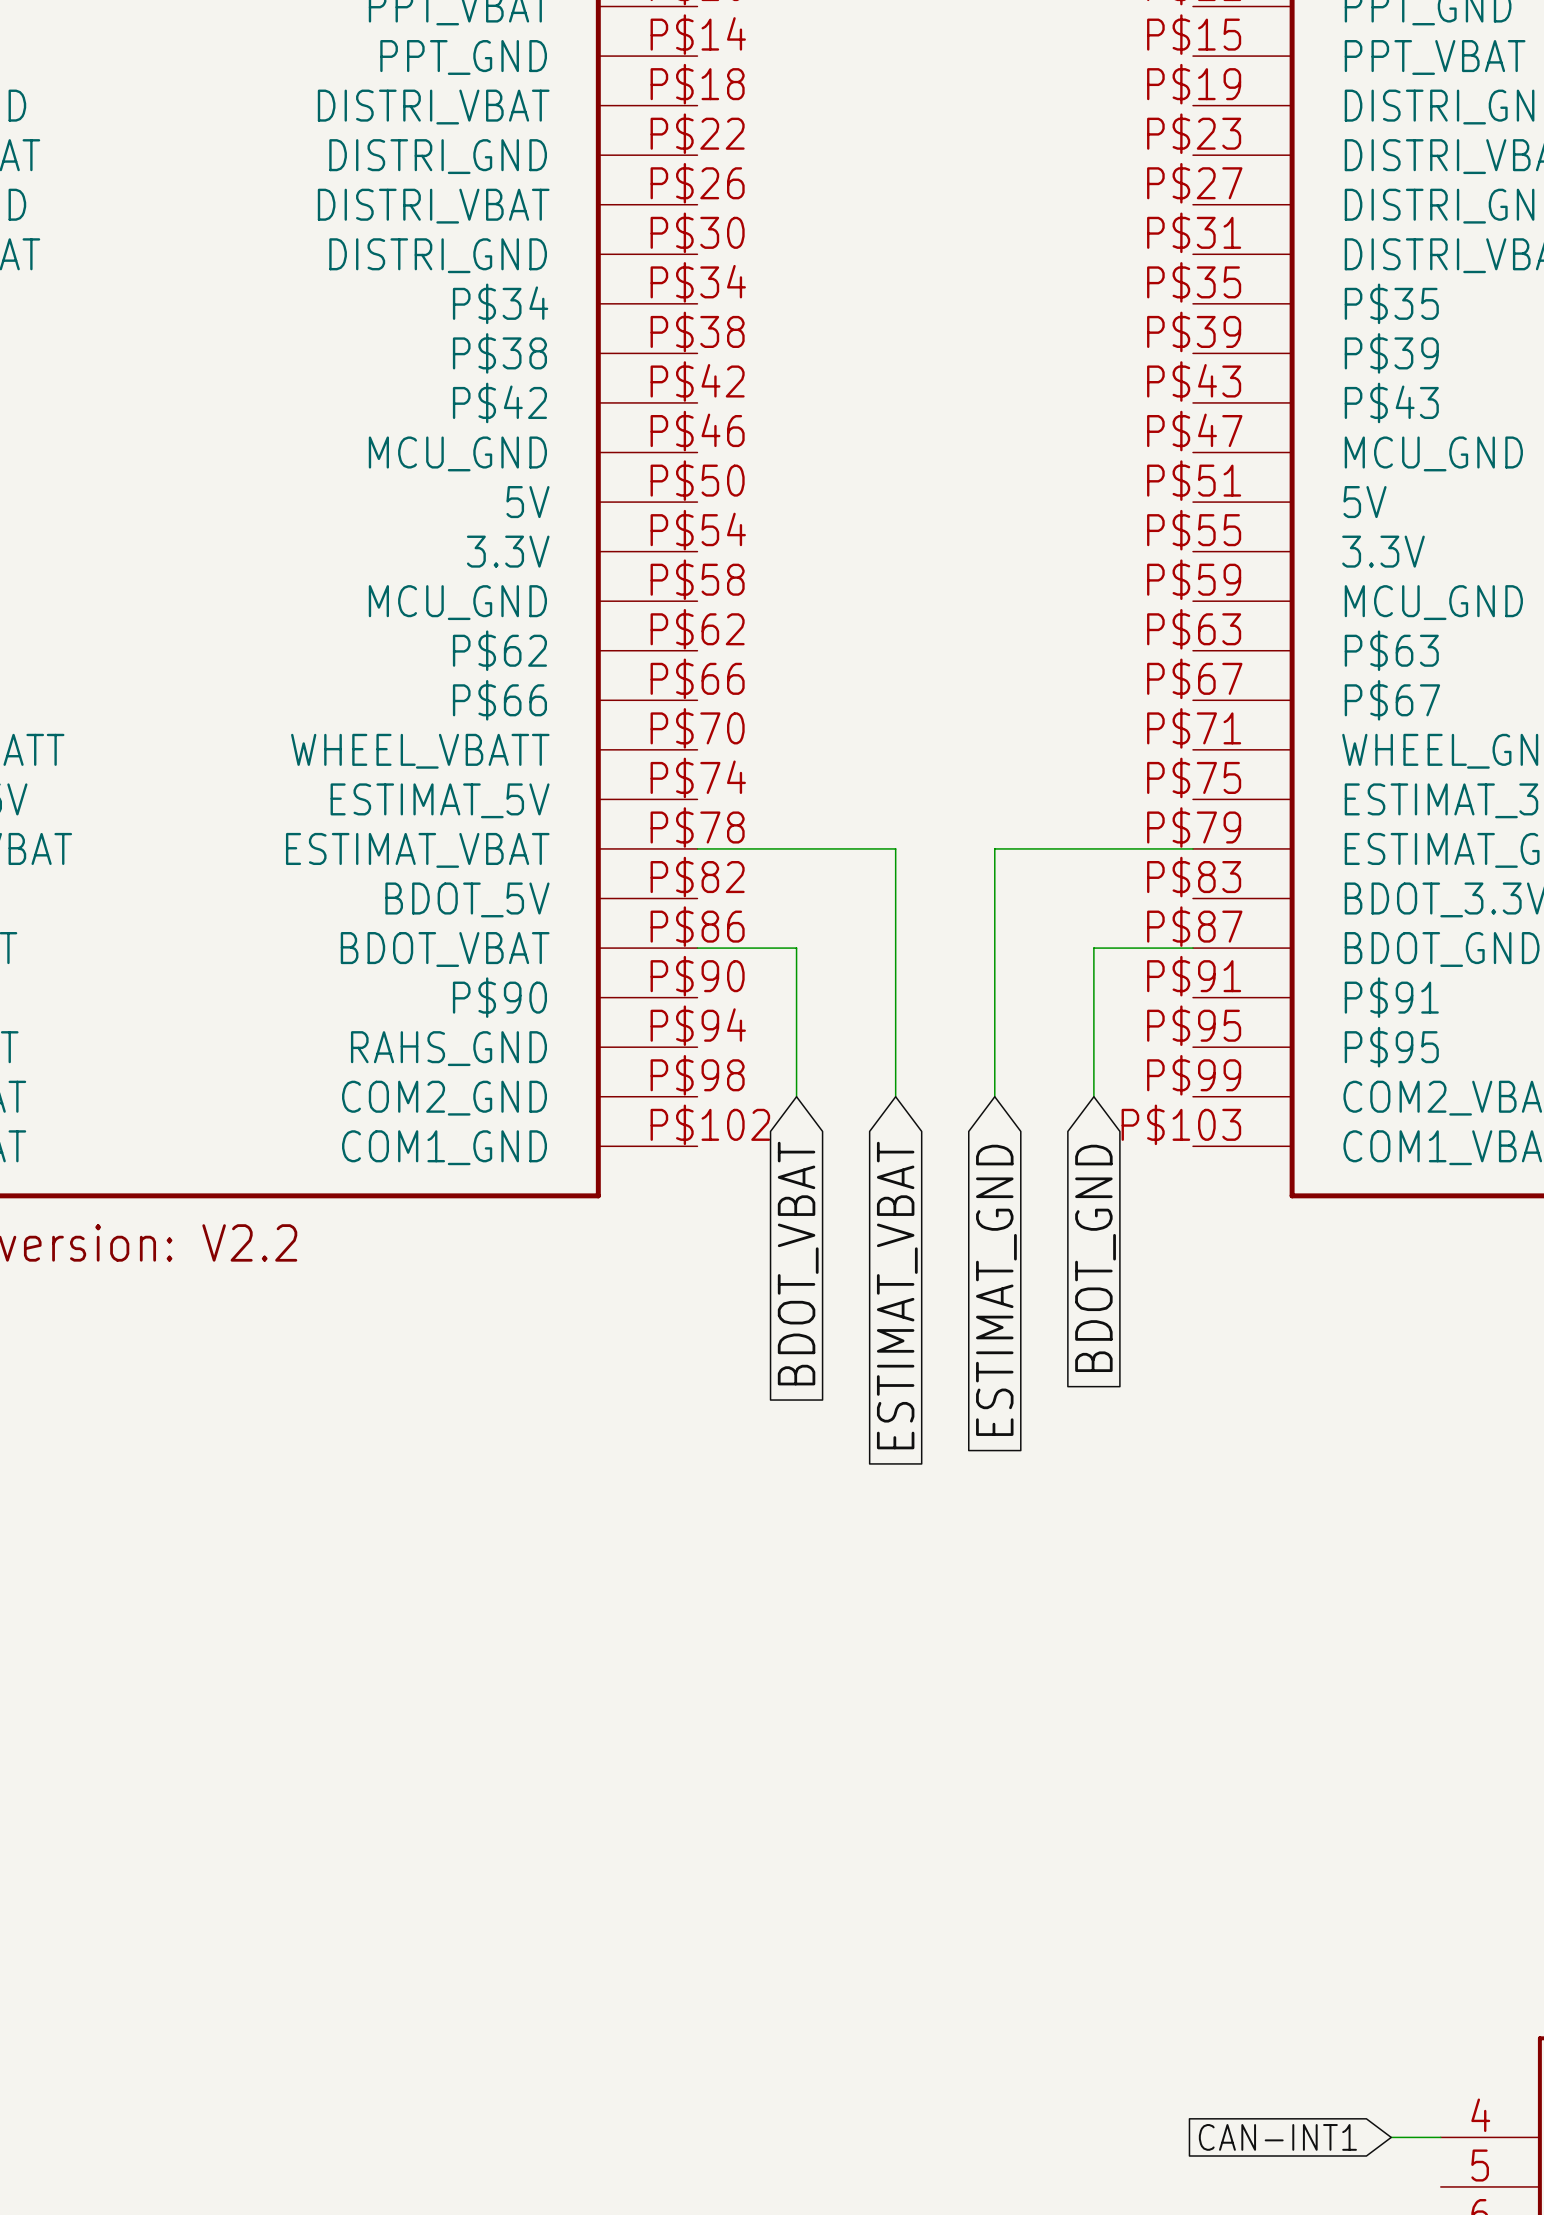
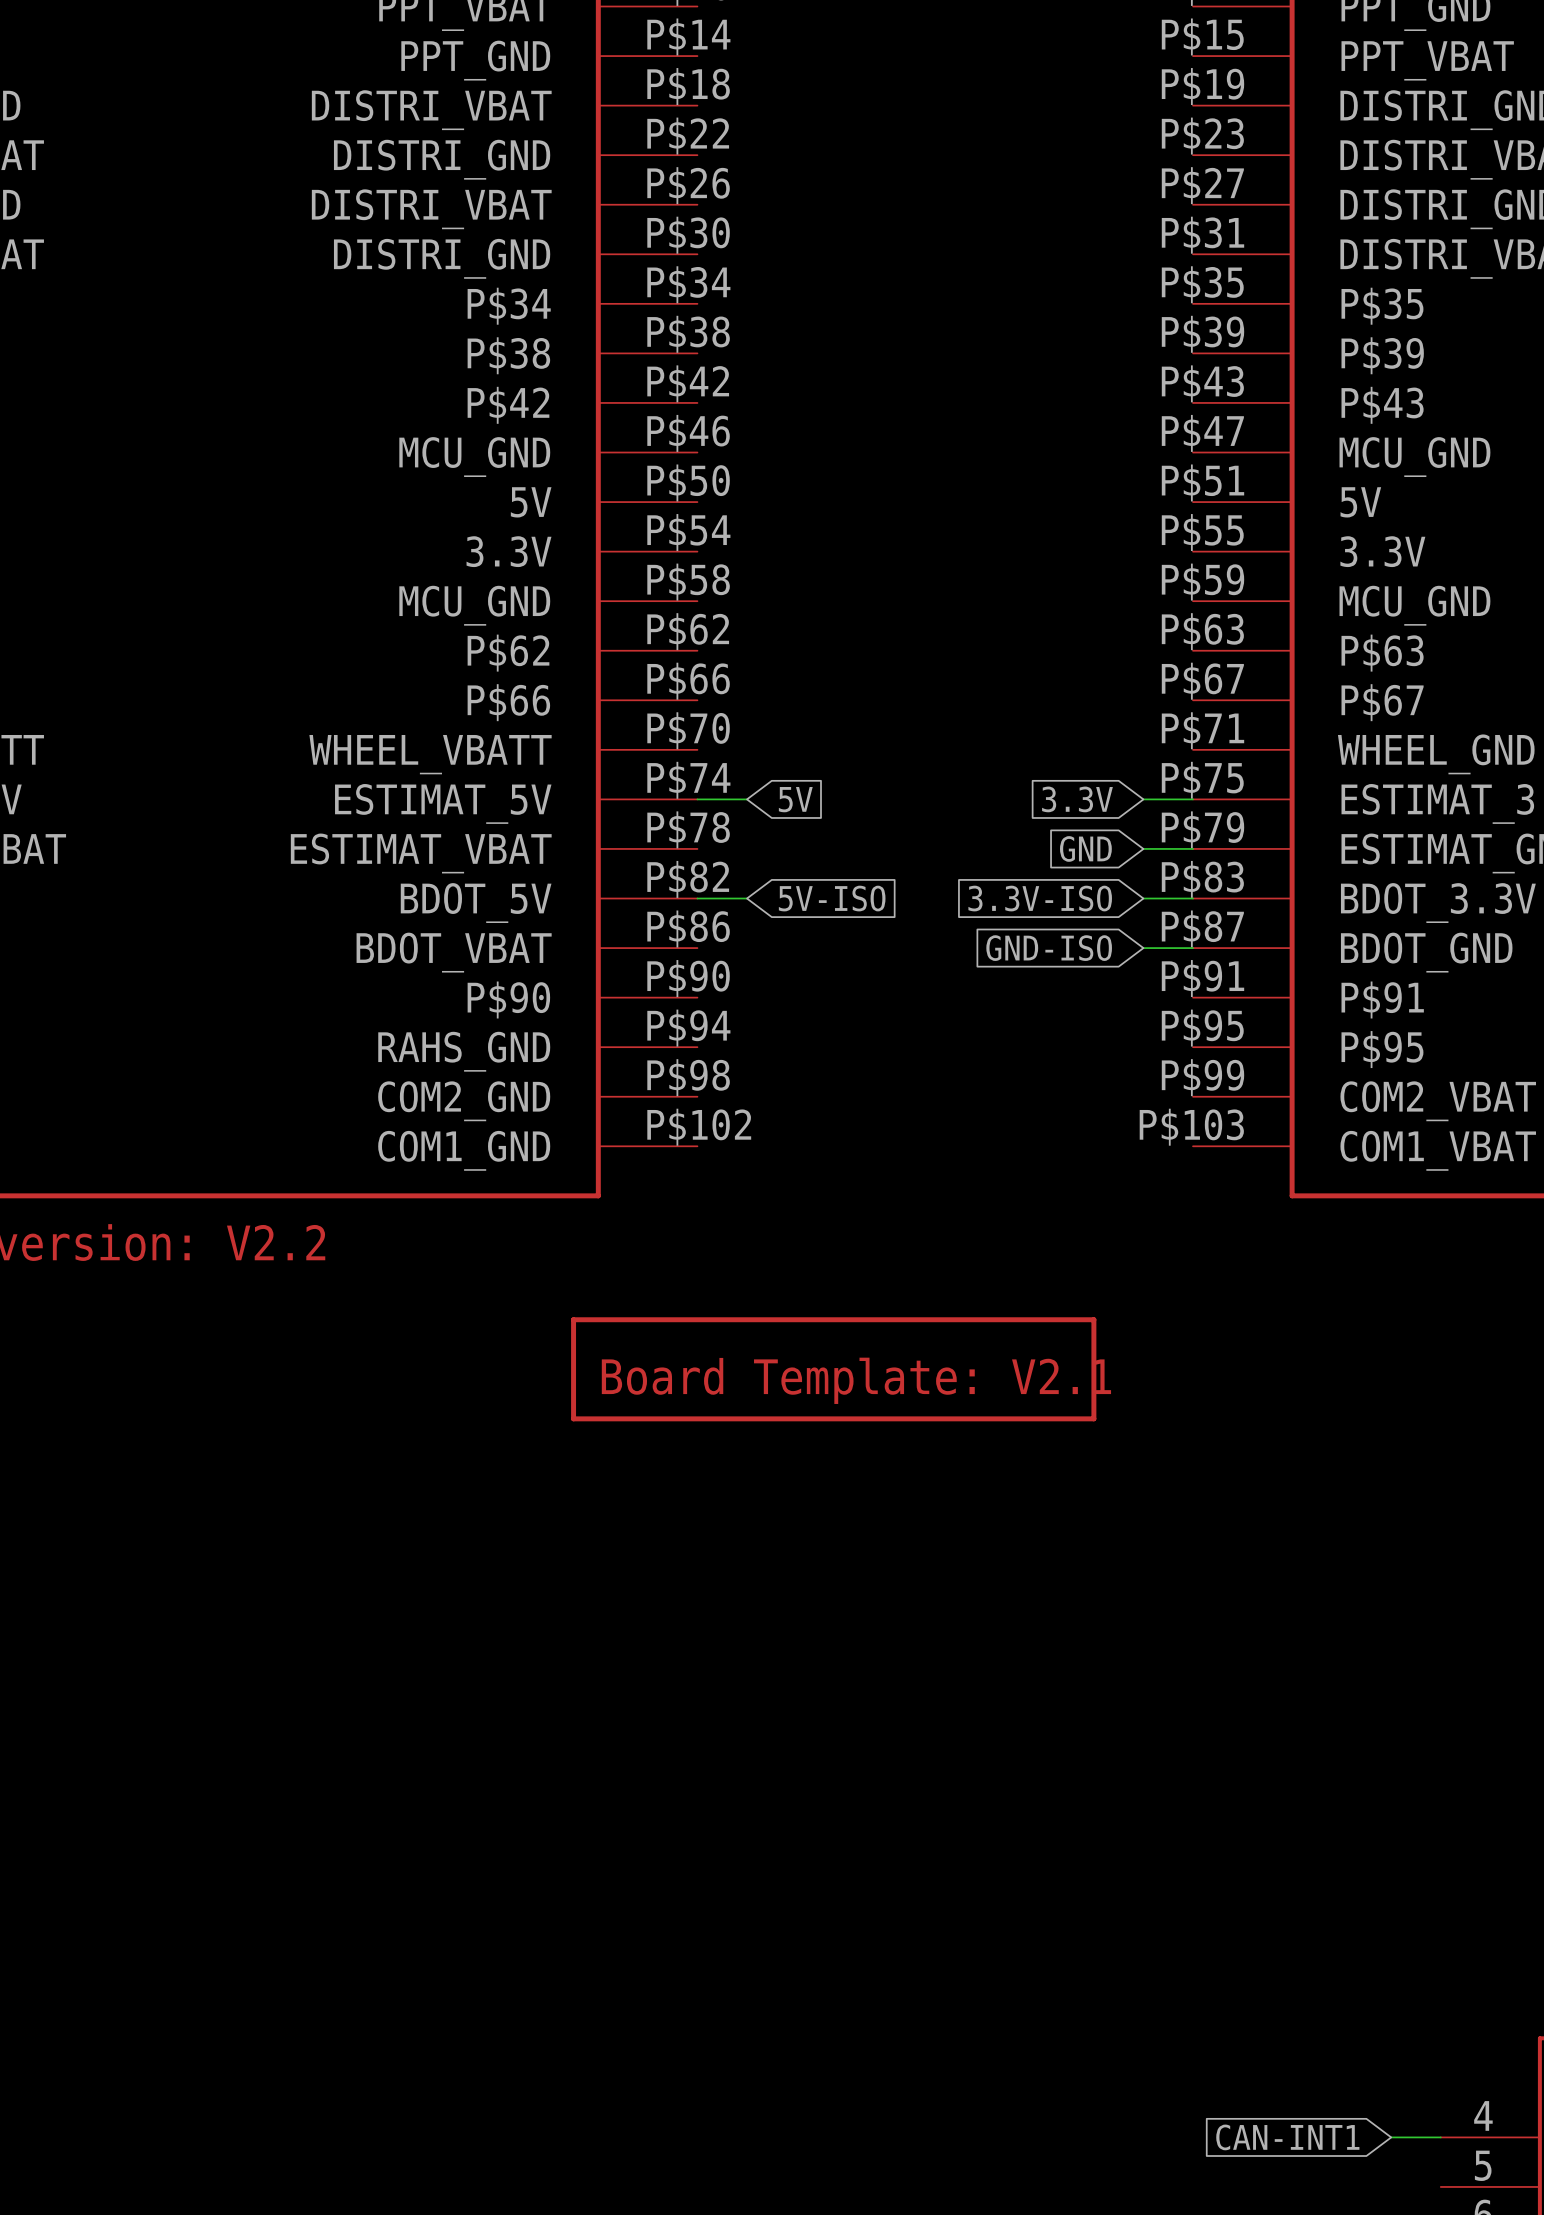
wire: none -> (697, 799) (747, 799)
global label: none -> 5V (795, 799)
global label: none -> 3.3V (1077, 799)
wire: none -> (1143, 799) (1193, 799)
wire: (697, 848) (895, 848) (895, 1096) -> none
global label: none -> GND (1085, 848)
wire: (1143, 848) (994, 848) (994, 1096) -> none
wire: none -> (697, 898) (747, 898)
global label: none -> 5V-ISO (832, 898)
global label: none -> 3.3V-ISO (1040, 898)
wire: none -> (1143, 898) (1193, 898)
wire: (697, 948) (796, 948) (796, 1096) -> none
global label: none -> GND-ISO (1049, 948)
wire: (1143, 948) (1093, 948) (1093, 1096) -> none
global label: BDOT_GND (1095, 1258) -> none
global label: BDOT_VBAT (798, 1263) -> none
global label: ESTIMAT_GND (996, 1290) -> none
global label: ESTIMAT_VBAT (897, 1295) -> none
part: none -> (833, 1369)

